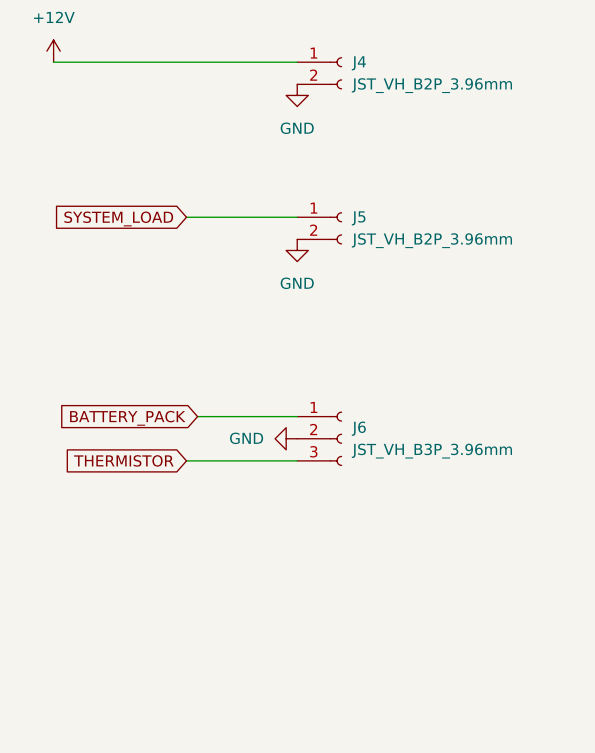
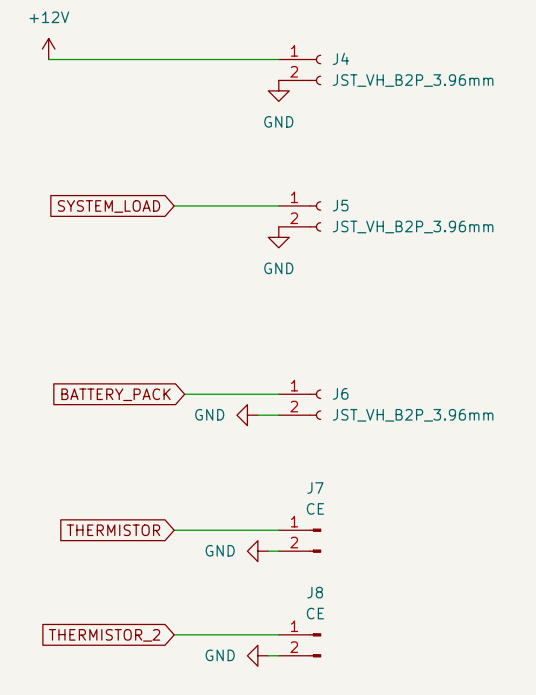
J6 symbol: [297, 411, 343, 467] -> [278, 389, 322, 420]
power symbol position: GND (286, 438) -> GND (247, 415)
J6 value: JST_VH_B3P_3.96mm (431, 451) -> JST_VH_B2P_3.96mm (413, 415)
global label position: THERMISTOR (123, 460) -> THERMISTOR (113, 530)
wire: (186, 460) (297, 460) -> (174, 530) (278, 530)
J7: none -> CE (300, 540)
power symbol: none -> GND (257, 551)
wire: none -> (268, 551) (278, 551)
wire: none -> (174, 634) (278, 634)
global label: none -> THERMISTOR_2 (104, 635)
J8: none -> CE (300, 645)
power symbol: none -> GND (257, 655)
wire: none -> (268, 655) (278, 655)

